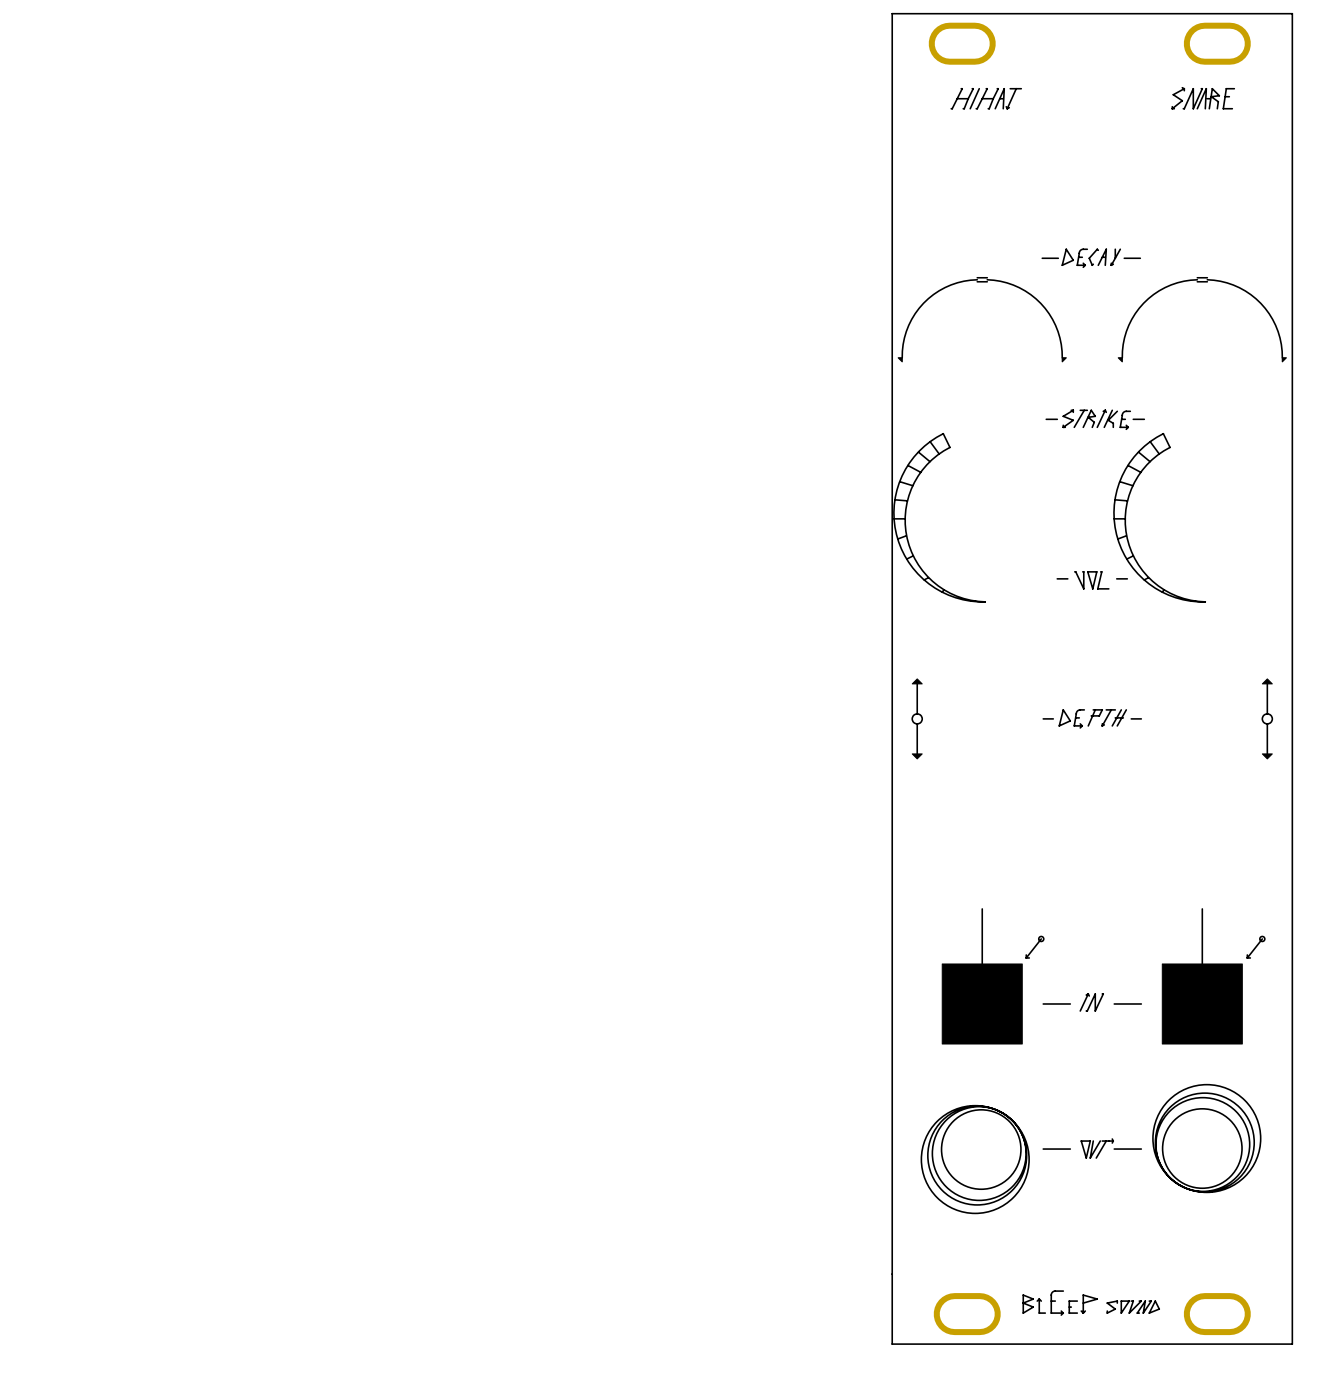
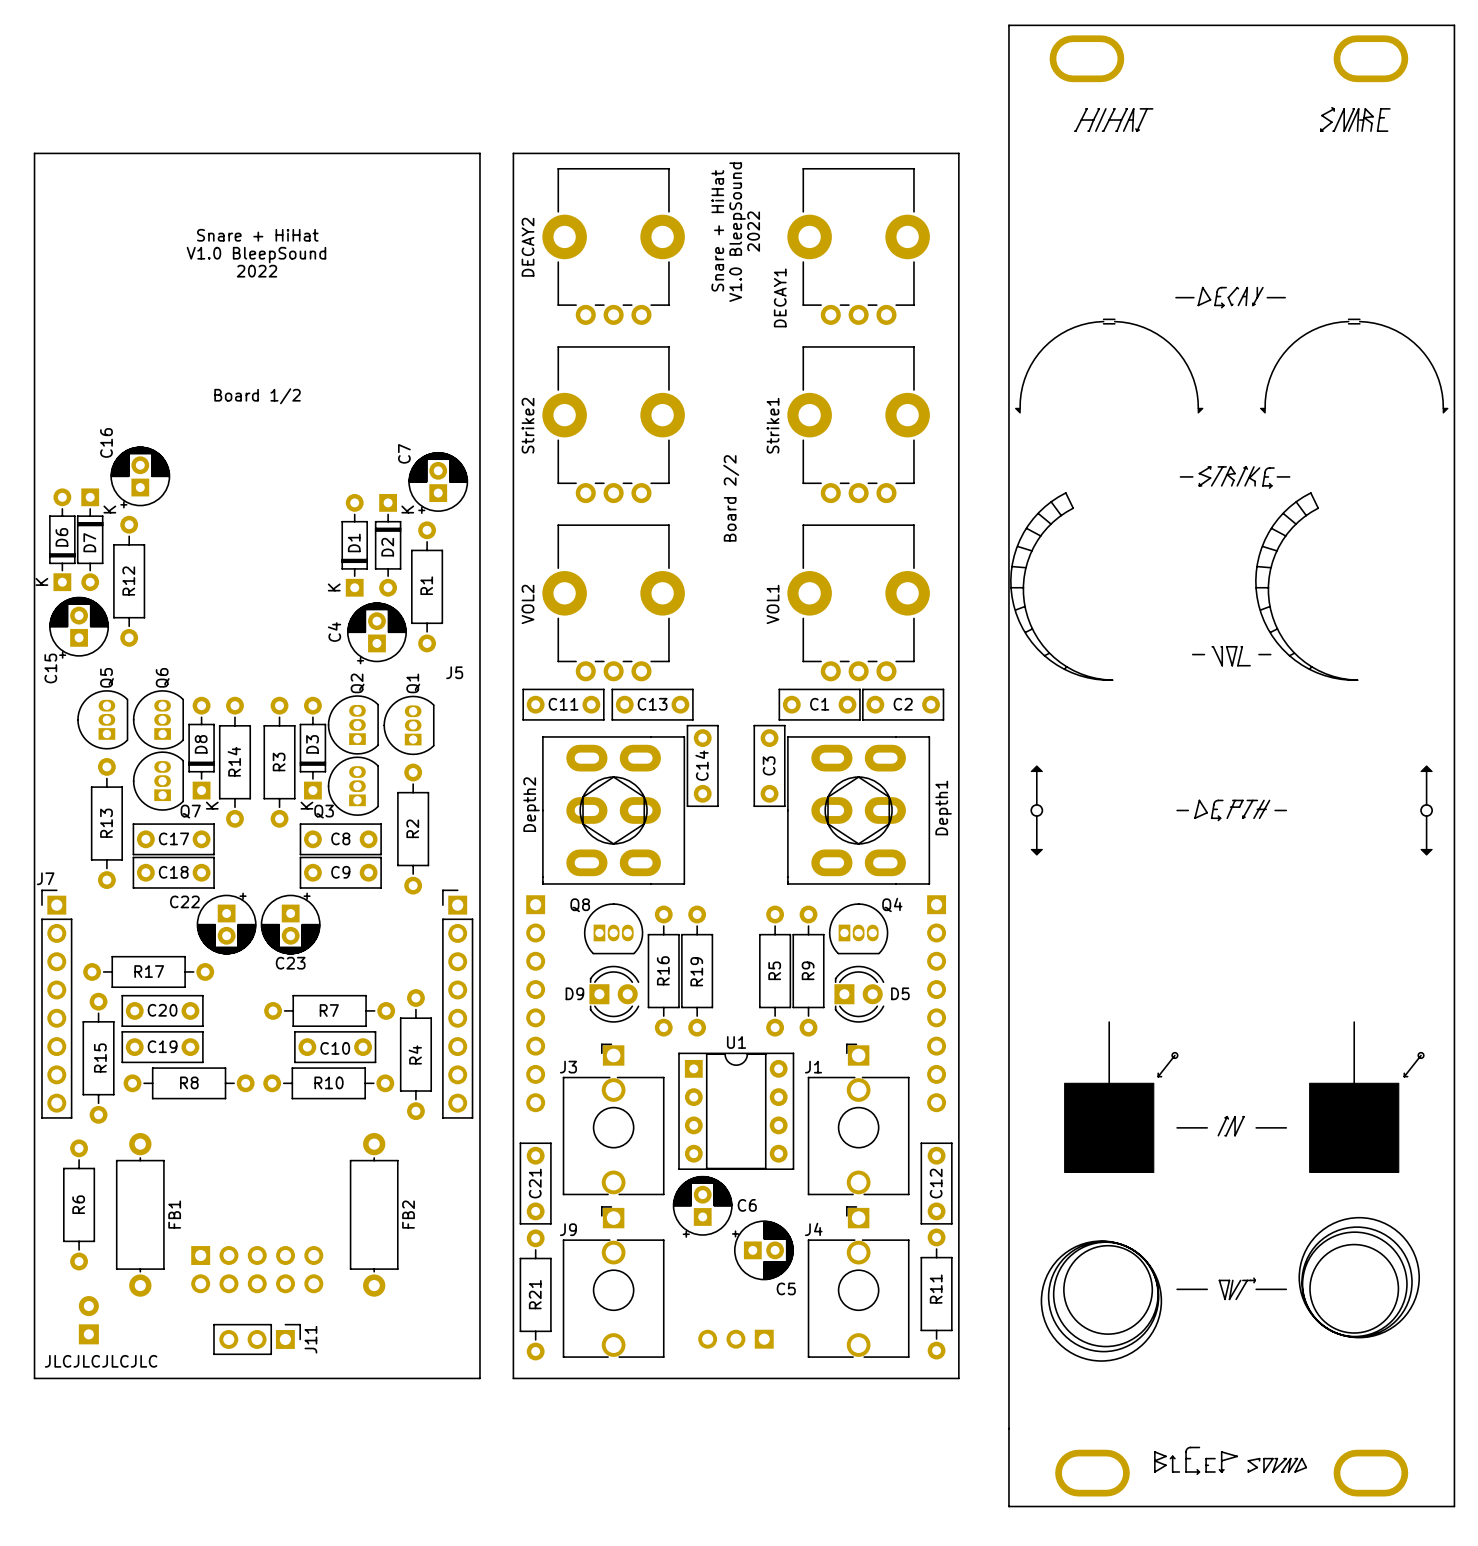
board edge: none -> (34, 153) (479, 153) (479, 1378) (34, 1378) (34, 153)
board edge: none -> (513, 153) (958, 153) (958, 1378) (513, 1378) (513, 153)
text: none -> Snare + HiHat (717, 230)
text: none -> 2022 (753, 231)
text: none -> V1.0 BleepSound (737, 232)
text: none -> Snare + HiHat (257, 235)
DECAY2: none -> (613, 246)
DECAY1: none -> (858, 246)
text: none -> V1.0 BleepSound (256, 255)
text: none -> 2022 (256, 271)
text: none -> Board 1/2 (257, 396)
Strike2: none -> (613, 424)
Strike1: none -> (858, 424)
C16: none -> (140, 477)
C7: none -> (438, 482)
text: none -> Board 2/2 (731, 498)
D6: none -> (62, 539)
D7: none -> (90, 539)
D1: none -> (354, 545)
D2: none -> (388, 545)
R12: none -> (129, 581)
R1: none -> (427, 586)
VOL2: none -> (613, 602)
VOL1: none -> (858, 602)
C15: none -> (79, 627)
C4: none -> (376, 633)
C11: none -> (563, 704)
C13: none -> (652, 704)
C1: none -> (819, 704)
C2: none -> (903, 704)
Q5: none -> (102, 719)
Q6: none -> (158, 719)
Q2: none -> (353, 724)
Q1: none -> (408, 725)
D8: none -> (201, 748)
D3: none -> (312, 748)
R14: none -> (234, 762)
R3: none -> (279, 762)
C14: none -> (702, 765)
C3: none -> (769, 765)
Q7: none -> (158, 781)
Q3: none -> (353, 786)
Depth2: none -> (613, 810)
Depth1: none -> (858, 810)
R13: none -> (106, 823)
R2: none -> (413, 829)
C17: none -> (173, 839)
C8: none -> (340, 839)
C18: none -> (173, 872)
C9: none -> (340, 872)
C22: none -> (226, 923)
C23: none -> (290, 923)
Q8: none -> (613, 928)
Q4: none -> (858, 928)
R17: none -> (148, 971)
R16: none -> (663, 971)
R19: none -> (697, 971)
R5: none -> (775, 971)
R9: none -> (808, 971)
D9: none -> (614, 994)
D5: none -> (859, 994)
J7: none -> (56, 1004)
J5: none -> (457, 1004)
part: none -> (535, 1003)
part: none -> (936, 1003)
C20: none -> (162, 1010)
R7: none -> (329, 1010)
C19: none -> (162, 1047)
C10: none -> (335, 1047)
R4: none -> (415, 1054)
R15: none -> (98, 1058)
R8: none -> (189, 1083)
R10: none -> (328, 1083)
U1: none -> (736, 1111)
J3: none -> (613, 1119)
J1: none -> (858, 1119)
C21: none -> (535, 1183)
C12: none -> (936, 1183)
R6: none -> (79, 1204)
C6: none -> (702, 1206)
FB1: none -> (140, 1214)
FB2: none -> (374, 1214)
C5: none -> (762, 1250)
part: none -> (257, 1269)
J9: none -> (613, 1282)
J4: none -> (858, 1282)
R11: none -> (936, 1294)
R21: none -> (535, 1294)
part: none -> (88, 1320)
part: none -> (735, 1339)
J11: none -> (257, 1339)
text: none -> JLCJLCJLCJLC (101, 1361)

